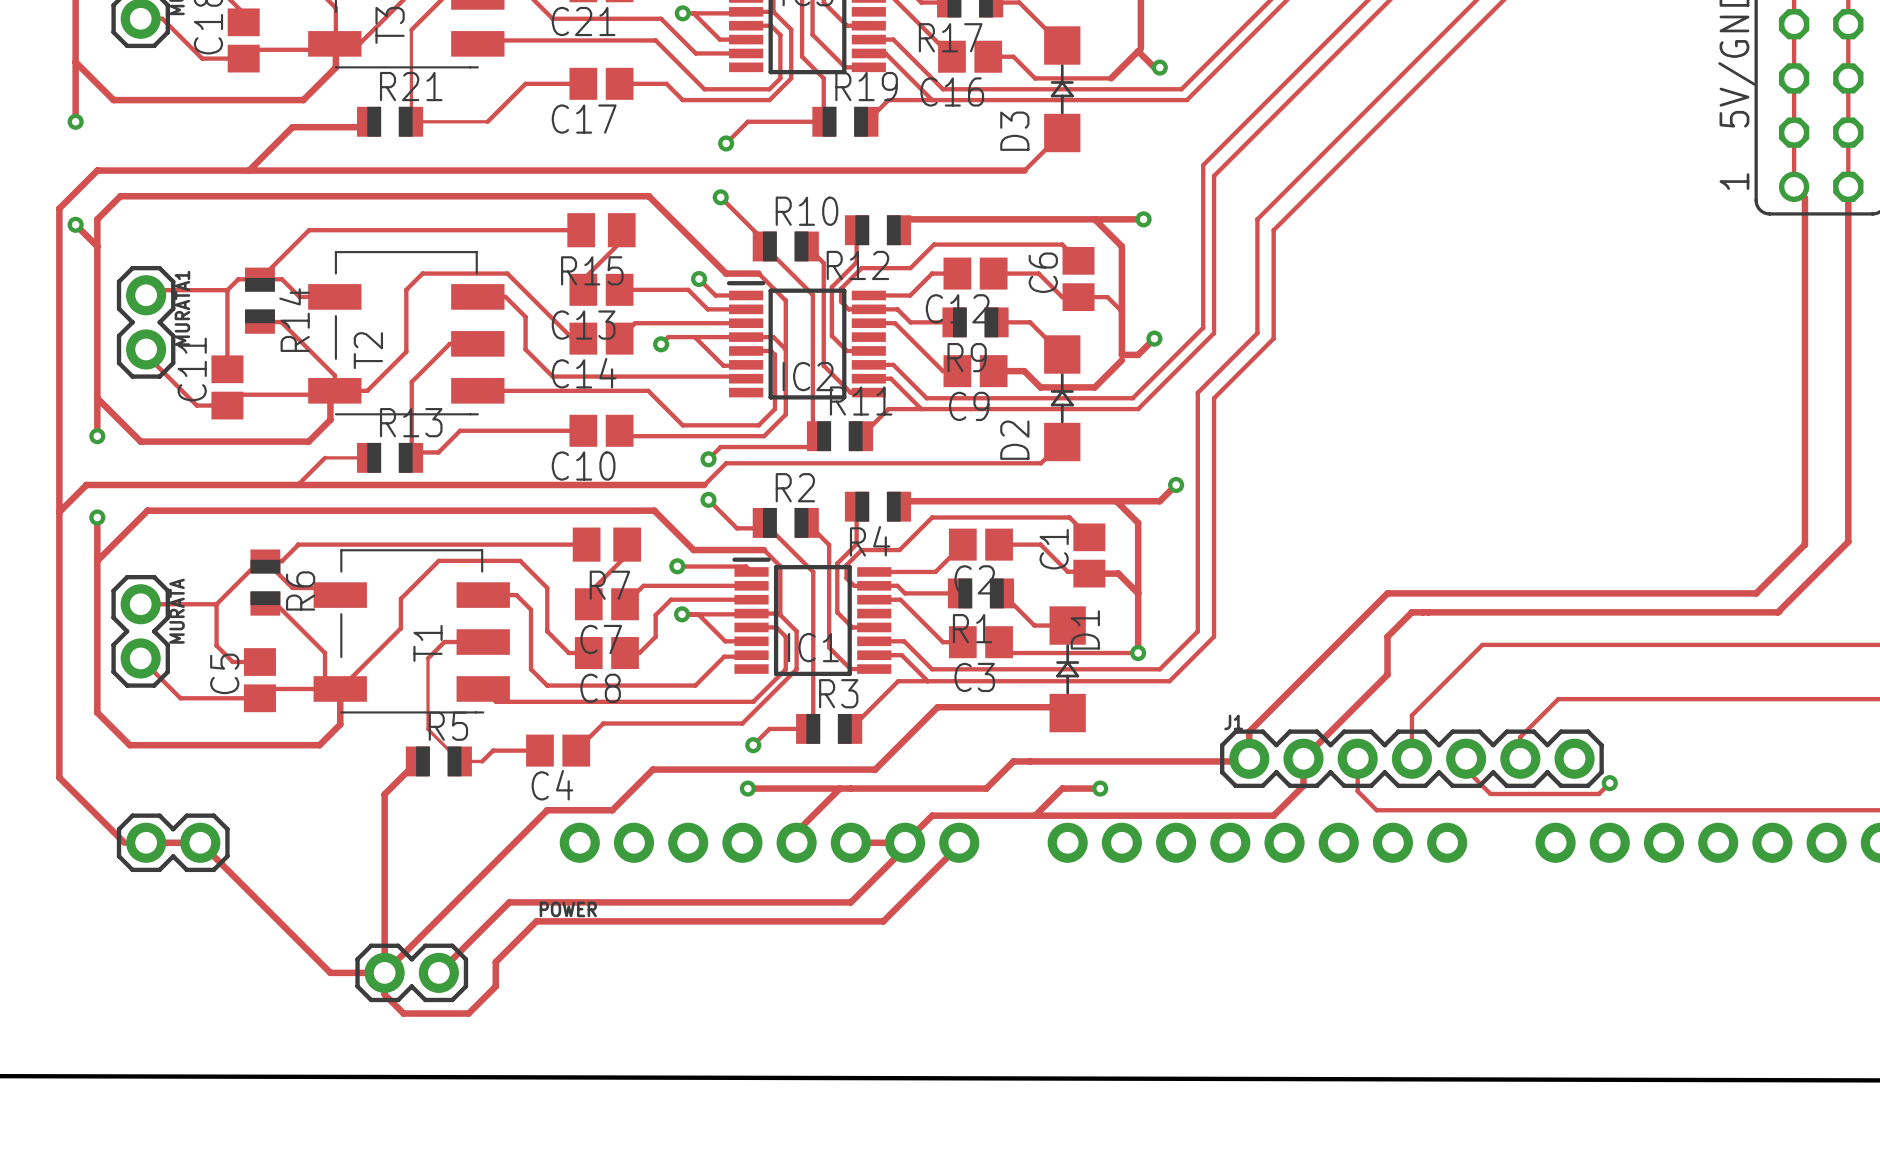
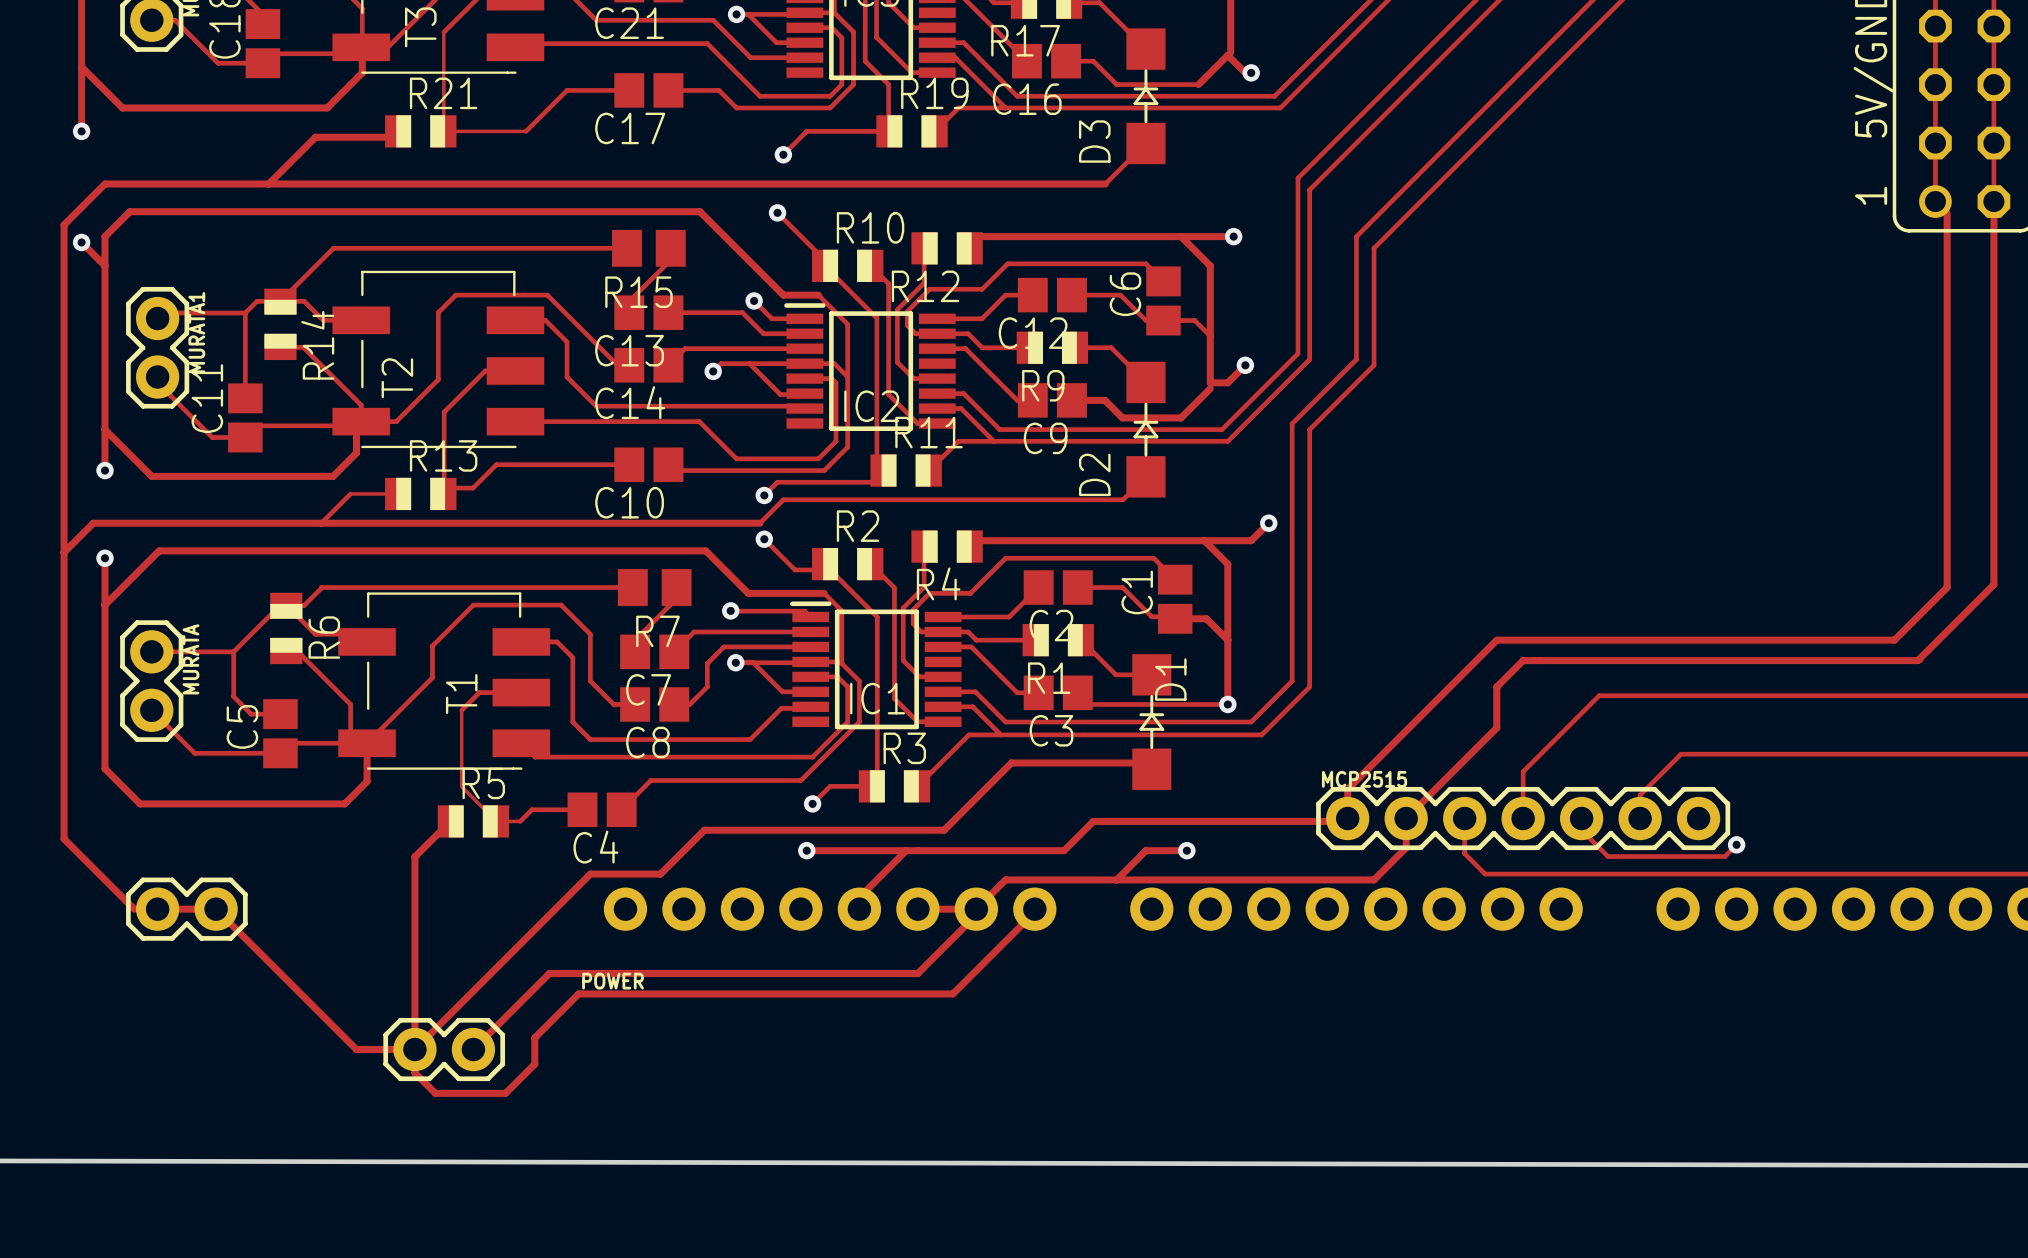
J1 name: J1 (1233, 722) -> MCP2515 (1364, 779)

